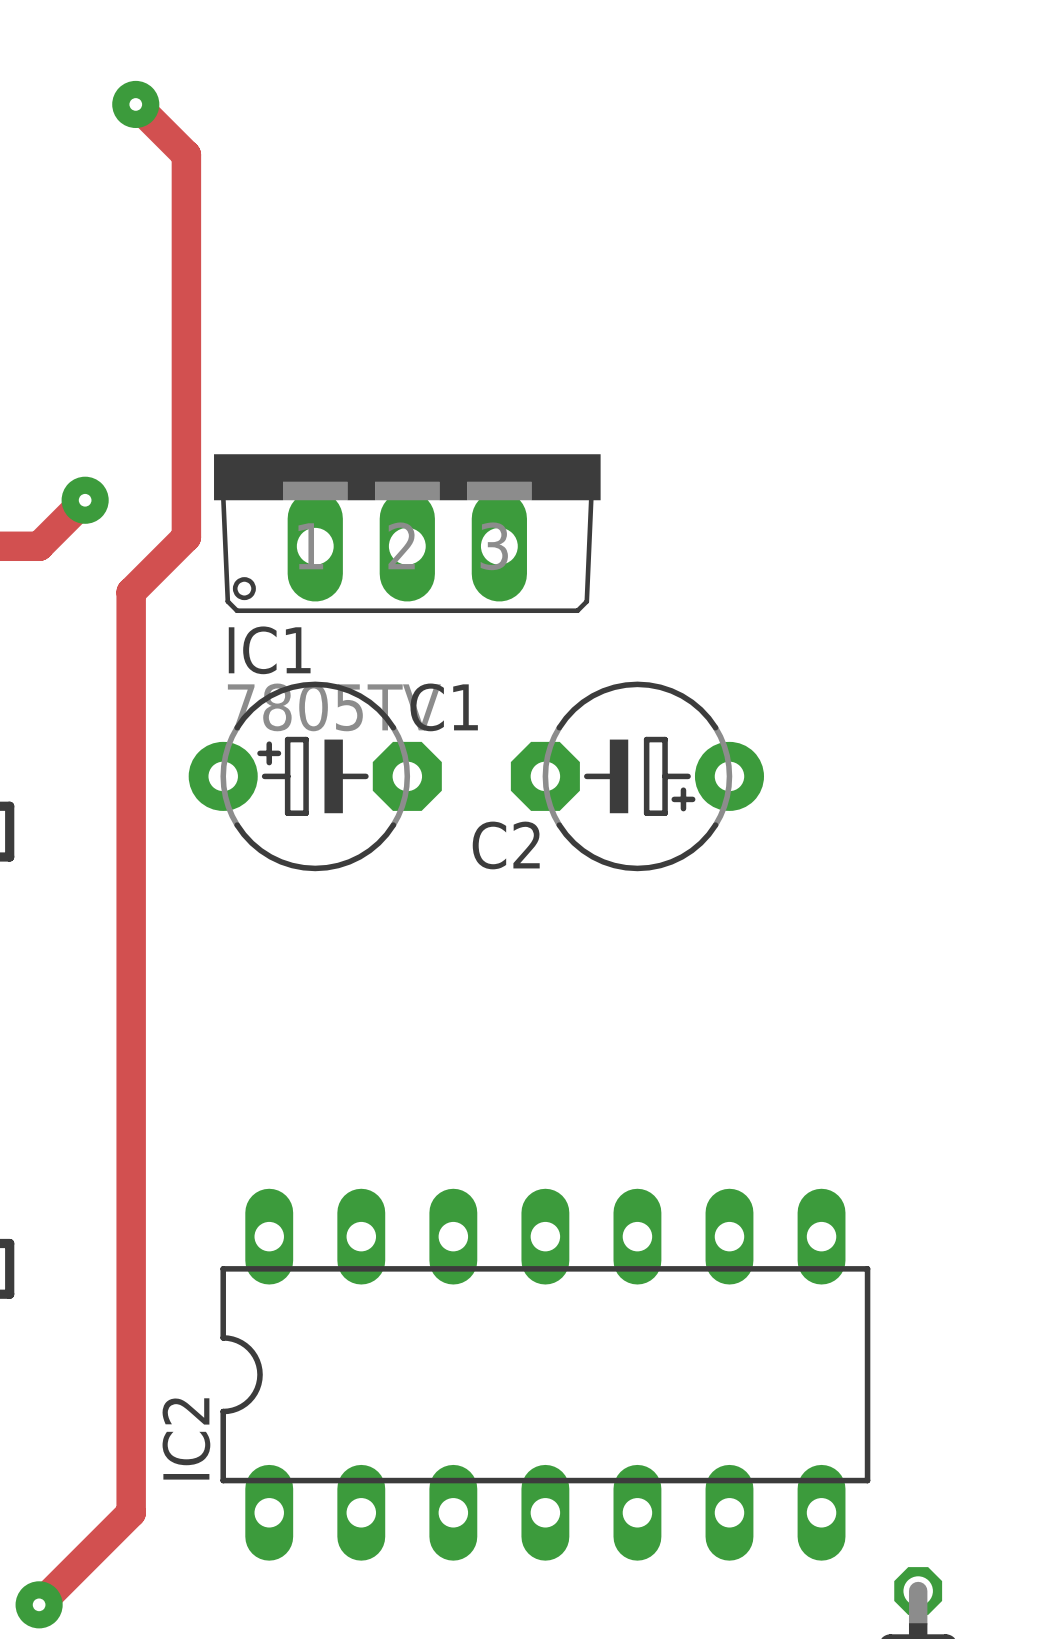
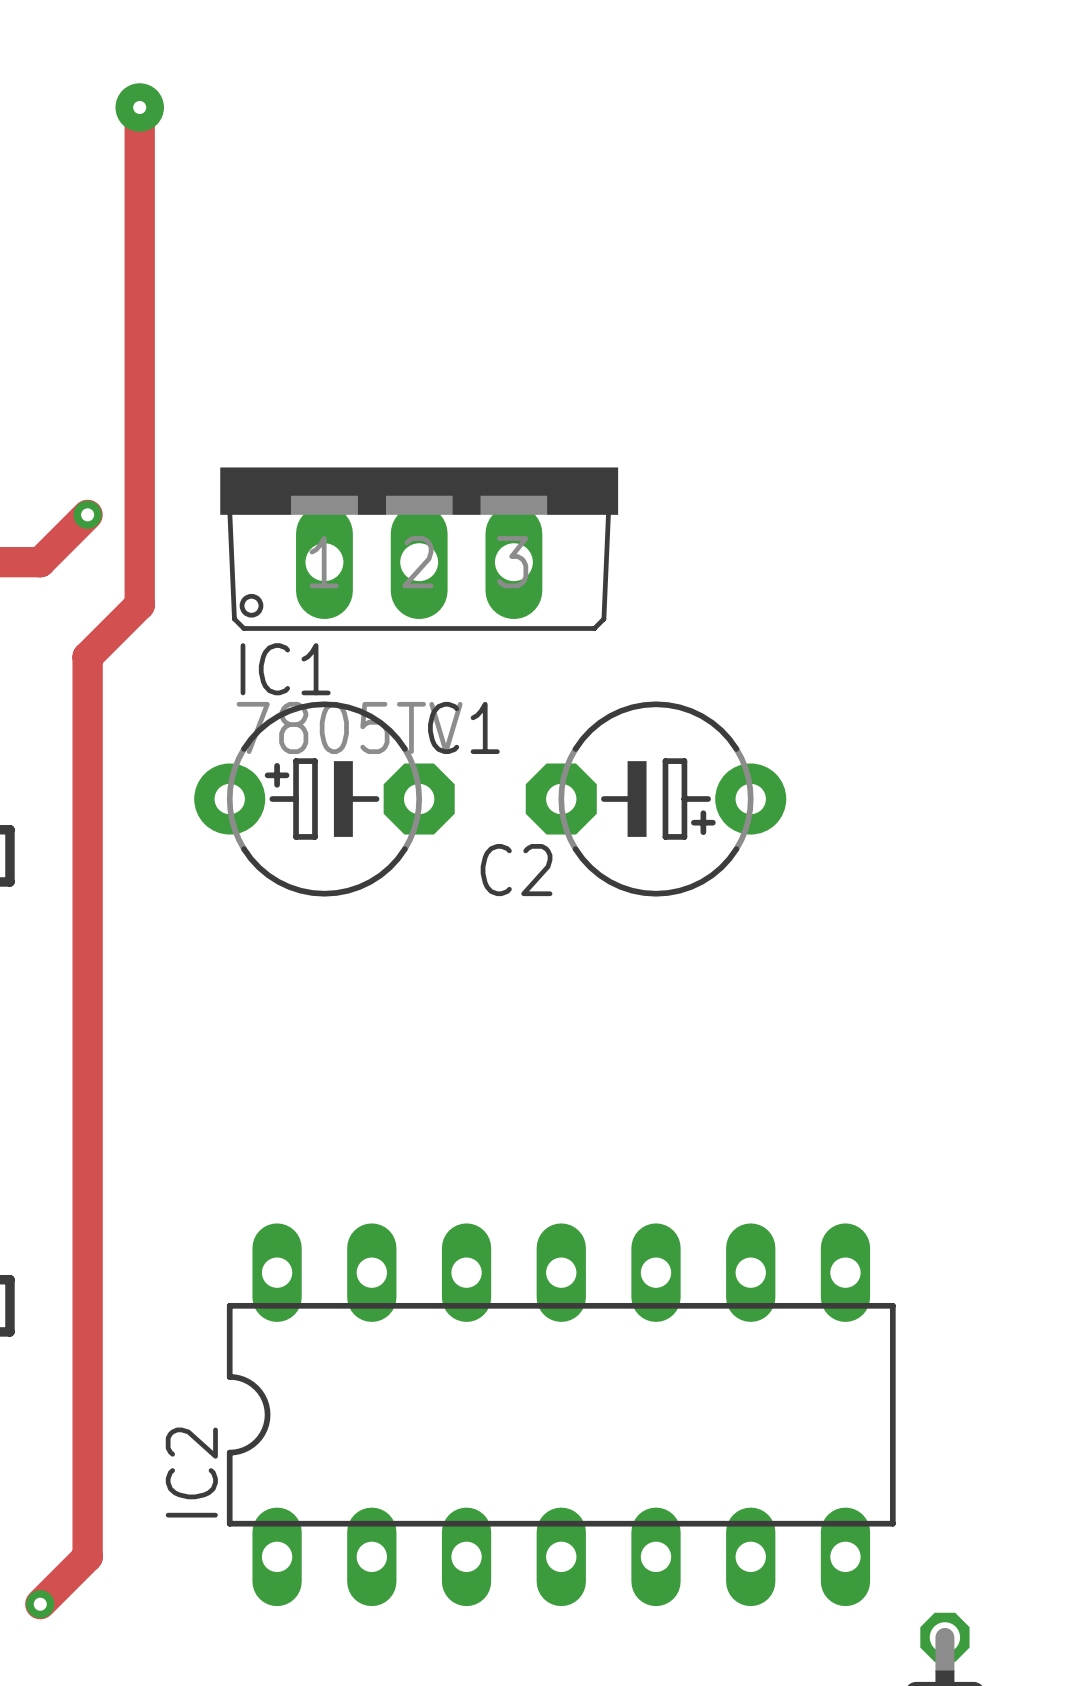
track: (135, 104) (186, 155) (186, 537) (135, 587) -> (139, 107) (139, 604)
via size: [61, 476, 109, 524] -> [73, 500, 102, 529]
track: (131, 592) (131, 1512) (39, 1604) -> (134, 609) (87, 656) (87, 1556) (40, 1604)
via: none -> (40, 1604)
via: (39, 1604) -> none

